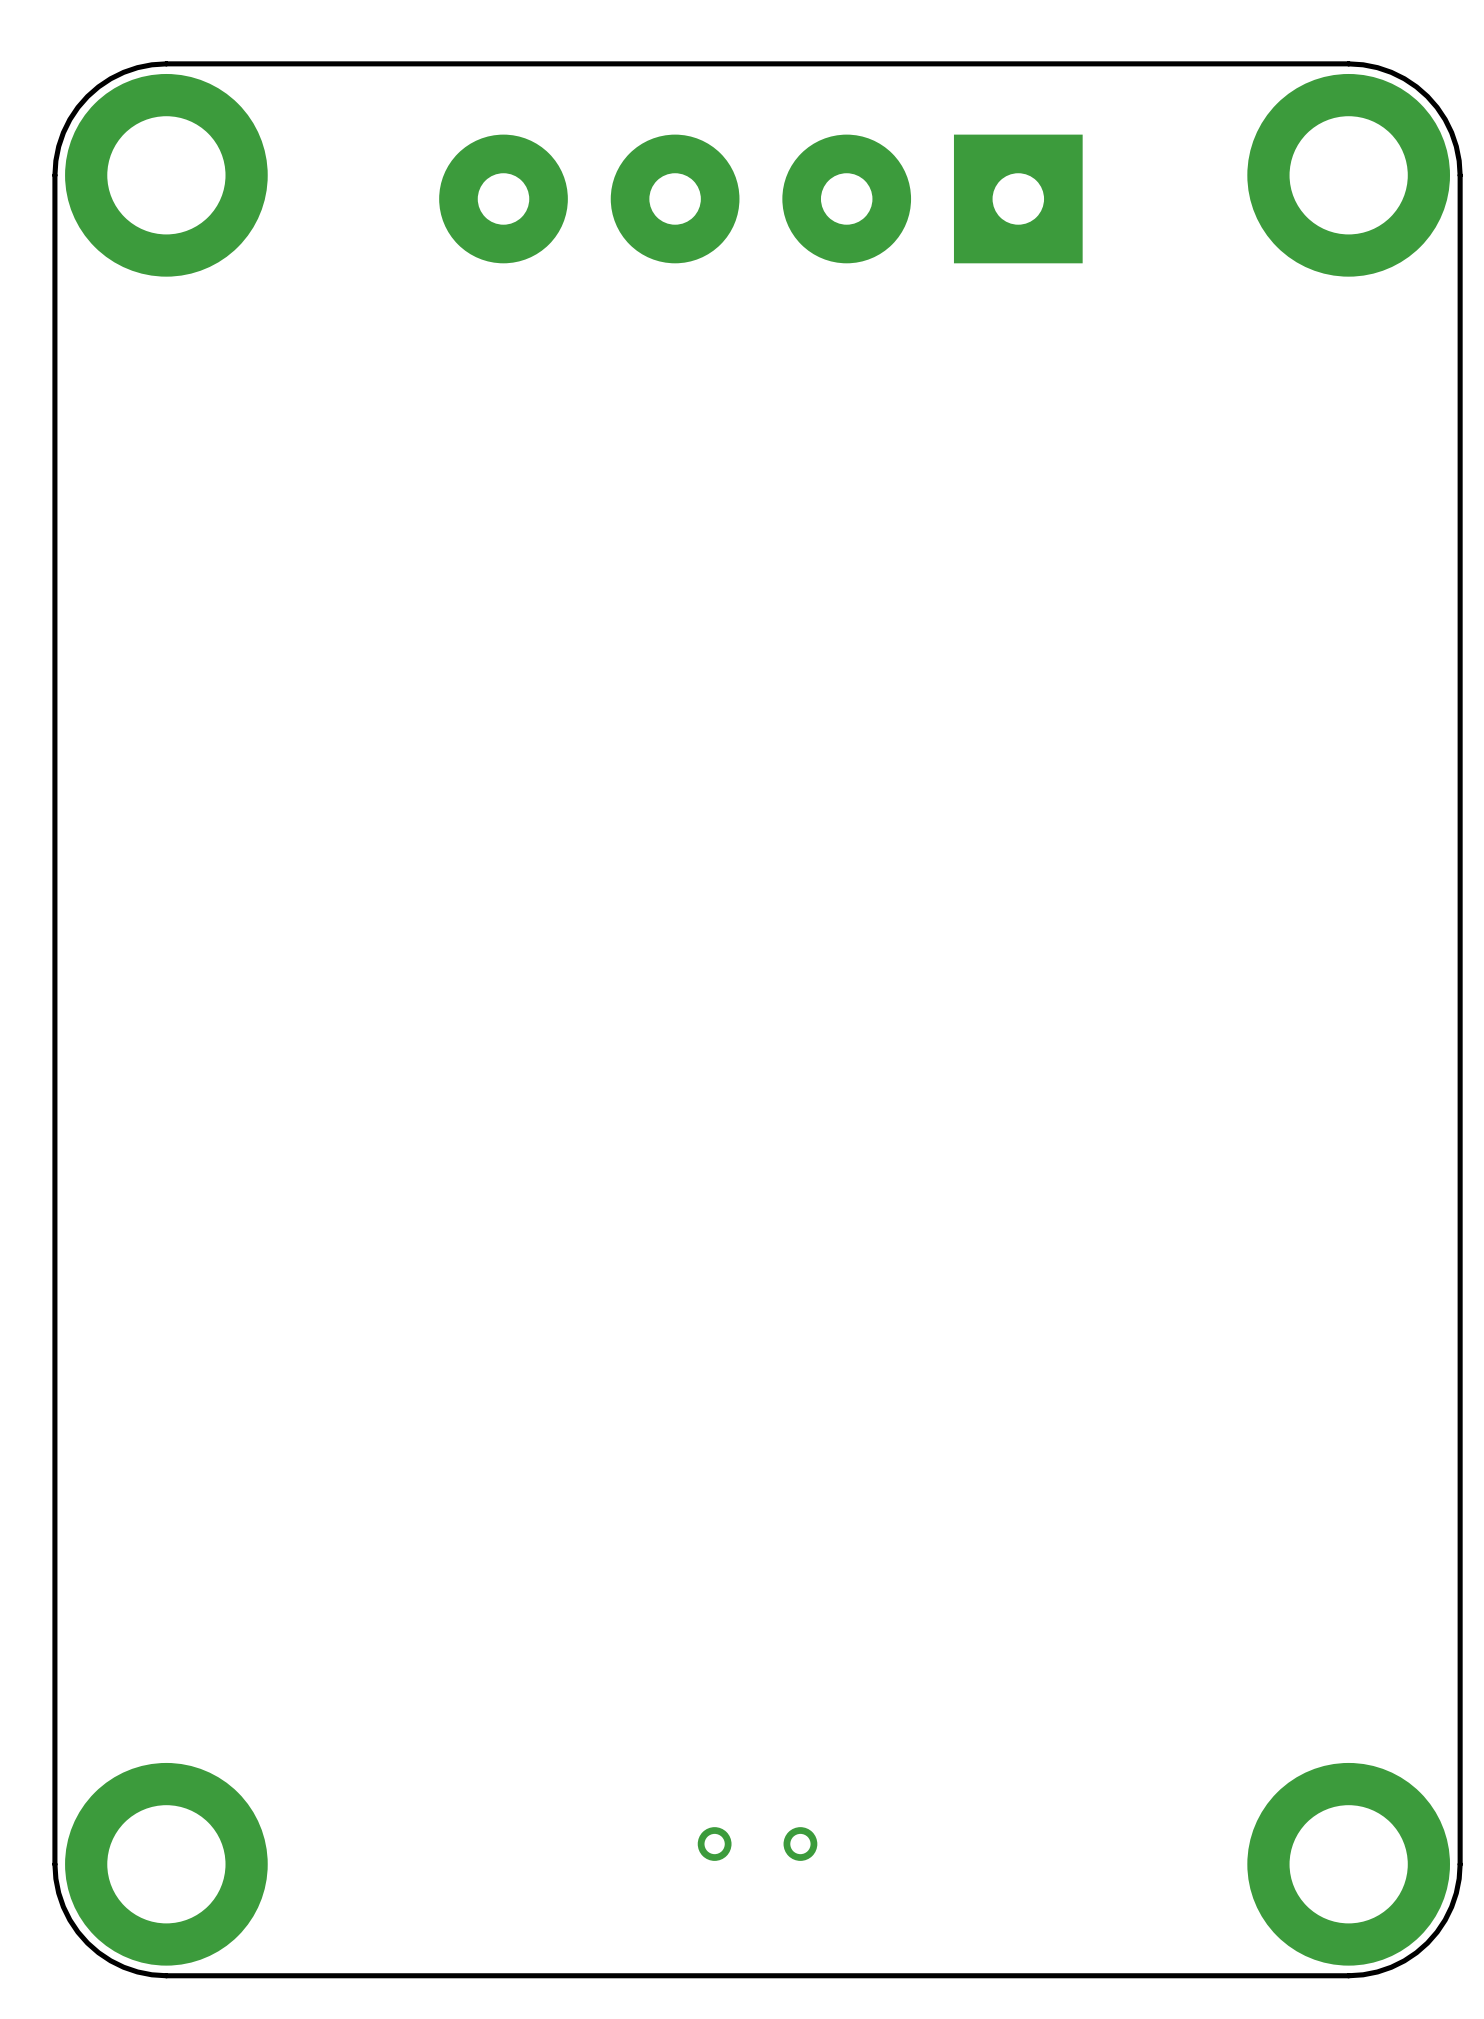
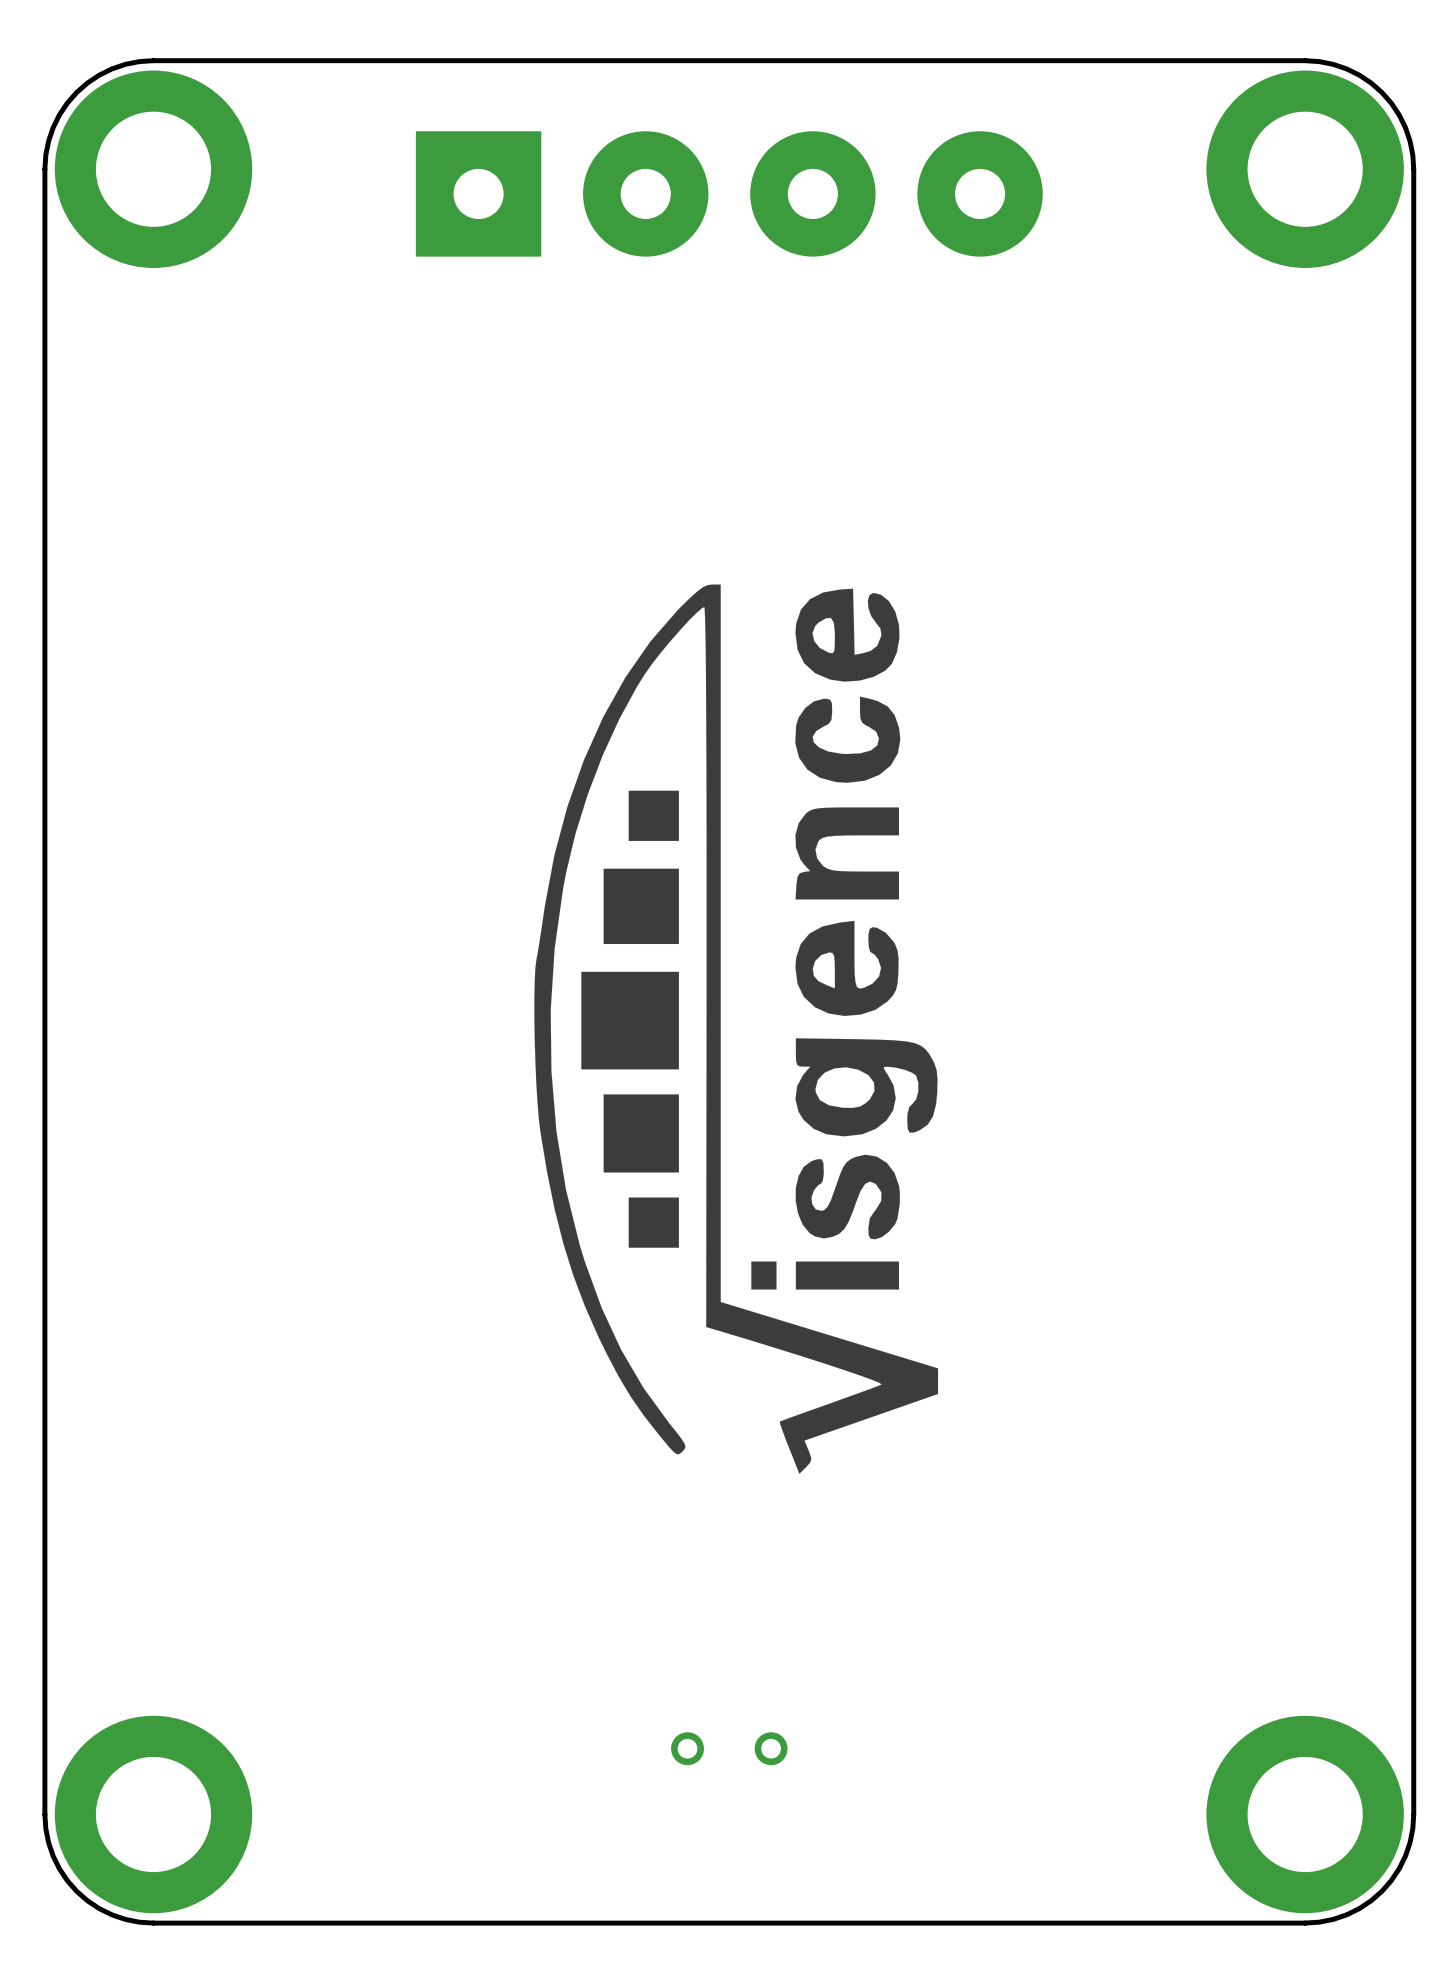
part rotation: 0° (760, 198) -> 180° (729, 193)
drawing: none -> [534, 584, 939, 1474]
part position: (757, 1844) -> (729, 1748)

